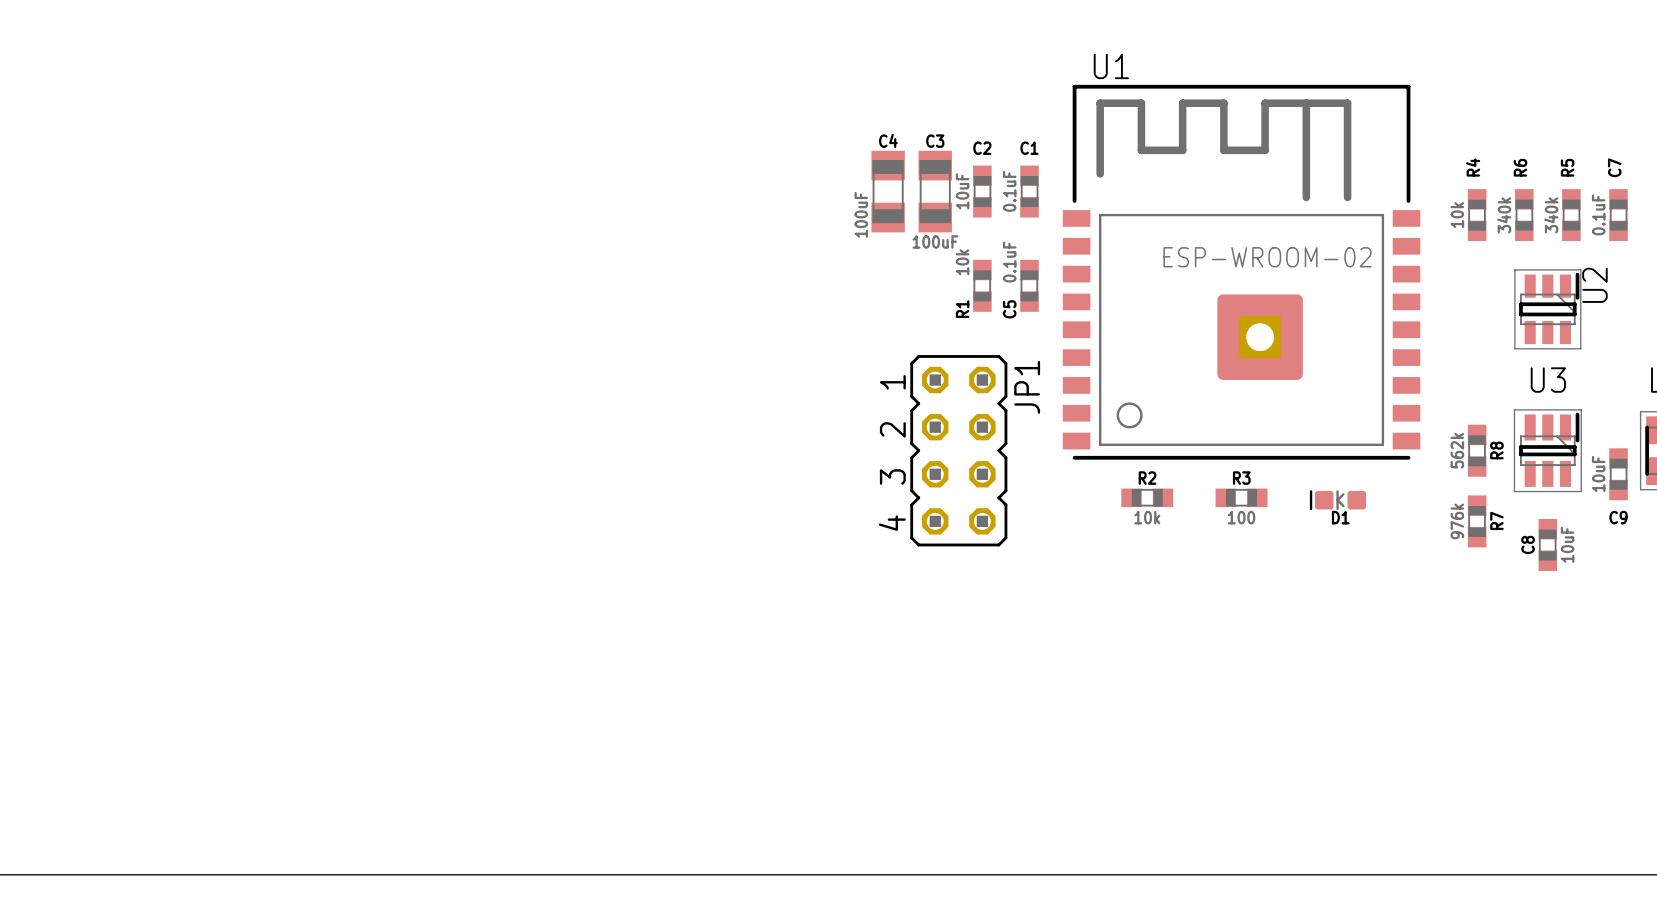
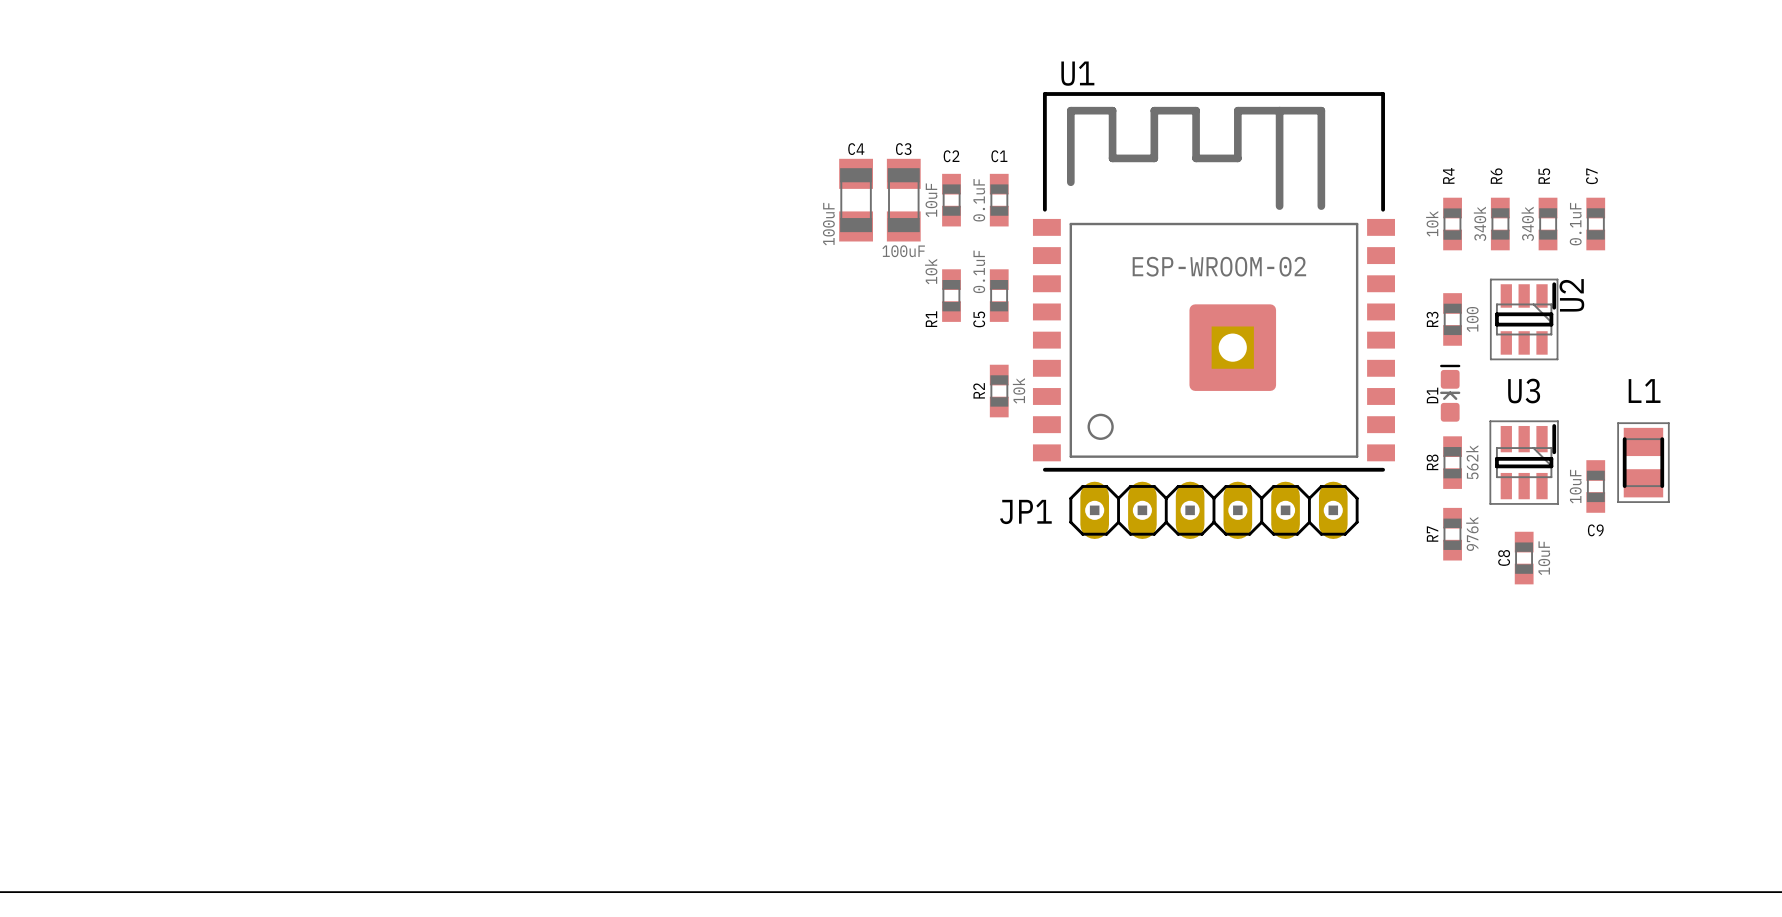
JP1 footprint: [910, 355, 1008, 547] -> [1069, 481, 1359, 539]
JP1 name position: JP1 (1027, 387) -> JP1 (1025, 511)
R8 value position: 562k (1457, 450) -> 562k (1472, 462)
R8 name position: R8 (1496, 450) -> R8 (1432, 462)
R2 rotation: 0° (1147, 497) -> 90° clockwise (999, 391)
R2 position: (1147, 497) -> (999, 391)
R3 rotation: 0° (1241, 497) -> 90° clockwise (1452, 319)
R3 position: (1241, 497) -> (1452, 319)
D1 rotation: 0° (1337, 500) -> 90° clockwise (1450, 393)
D1 position: (1337, 500) -> (1450, 393)
R7 name position: R7 (1496, 520) -> R7 (1432, 534)
R7 value position: 976k (1457, 521) -> 976k (1472, 533)

